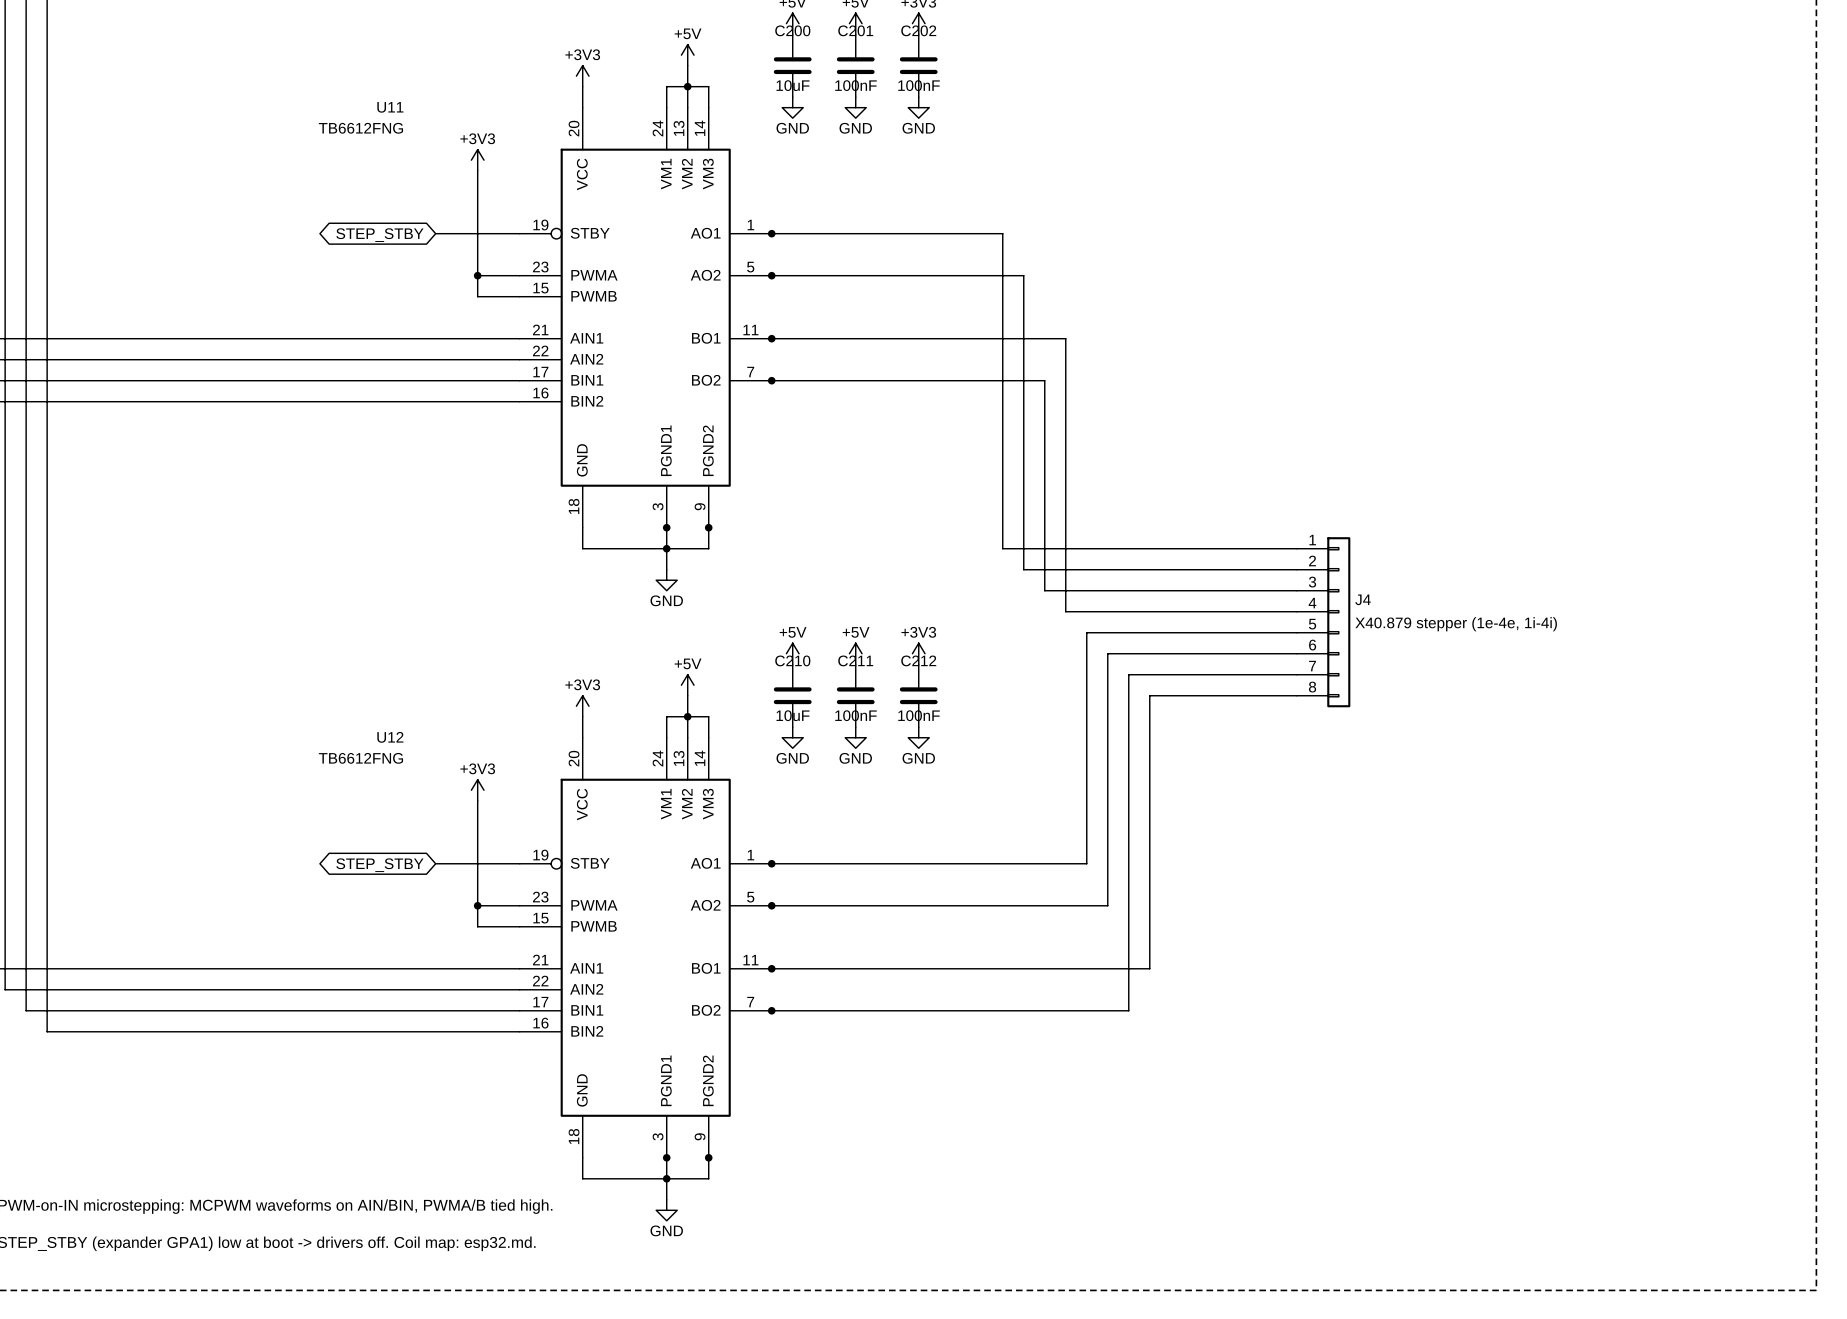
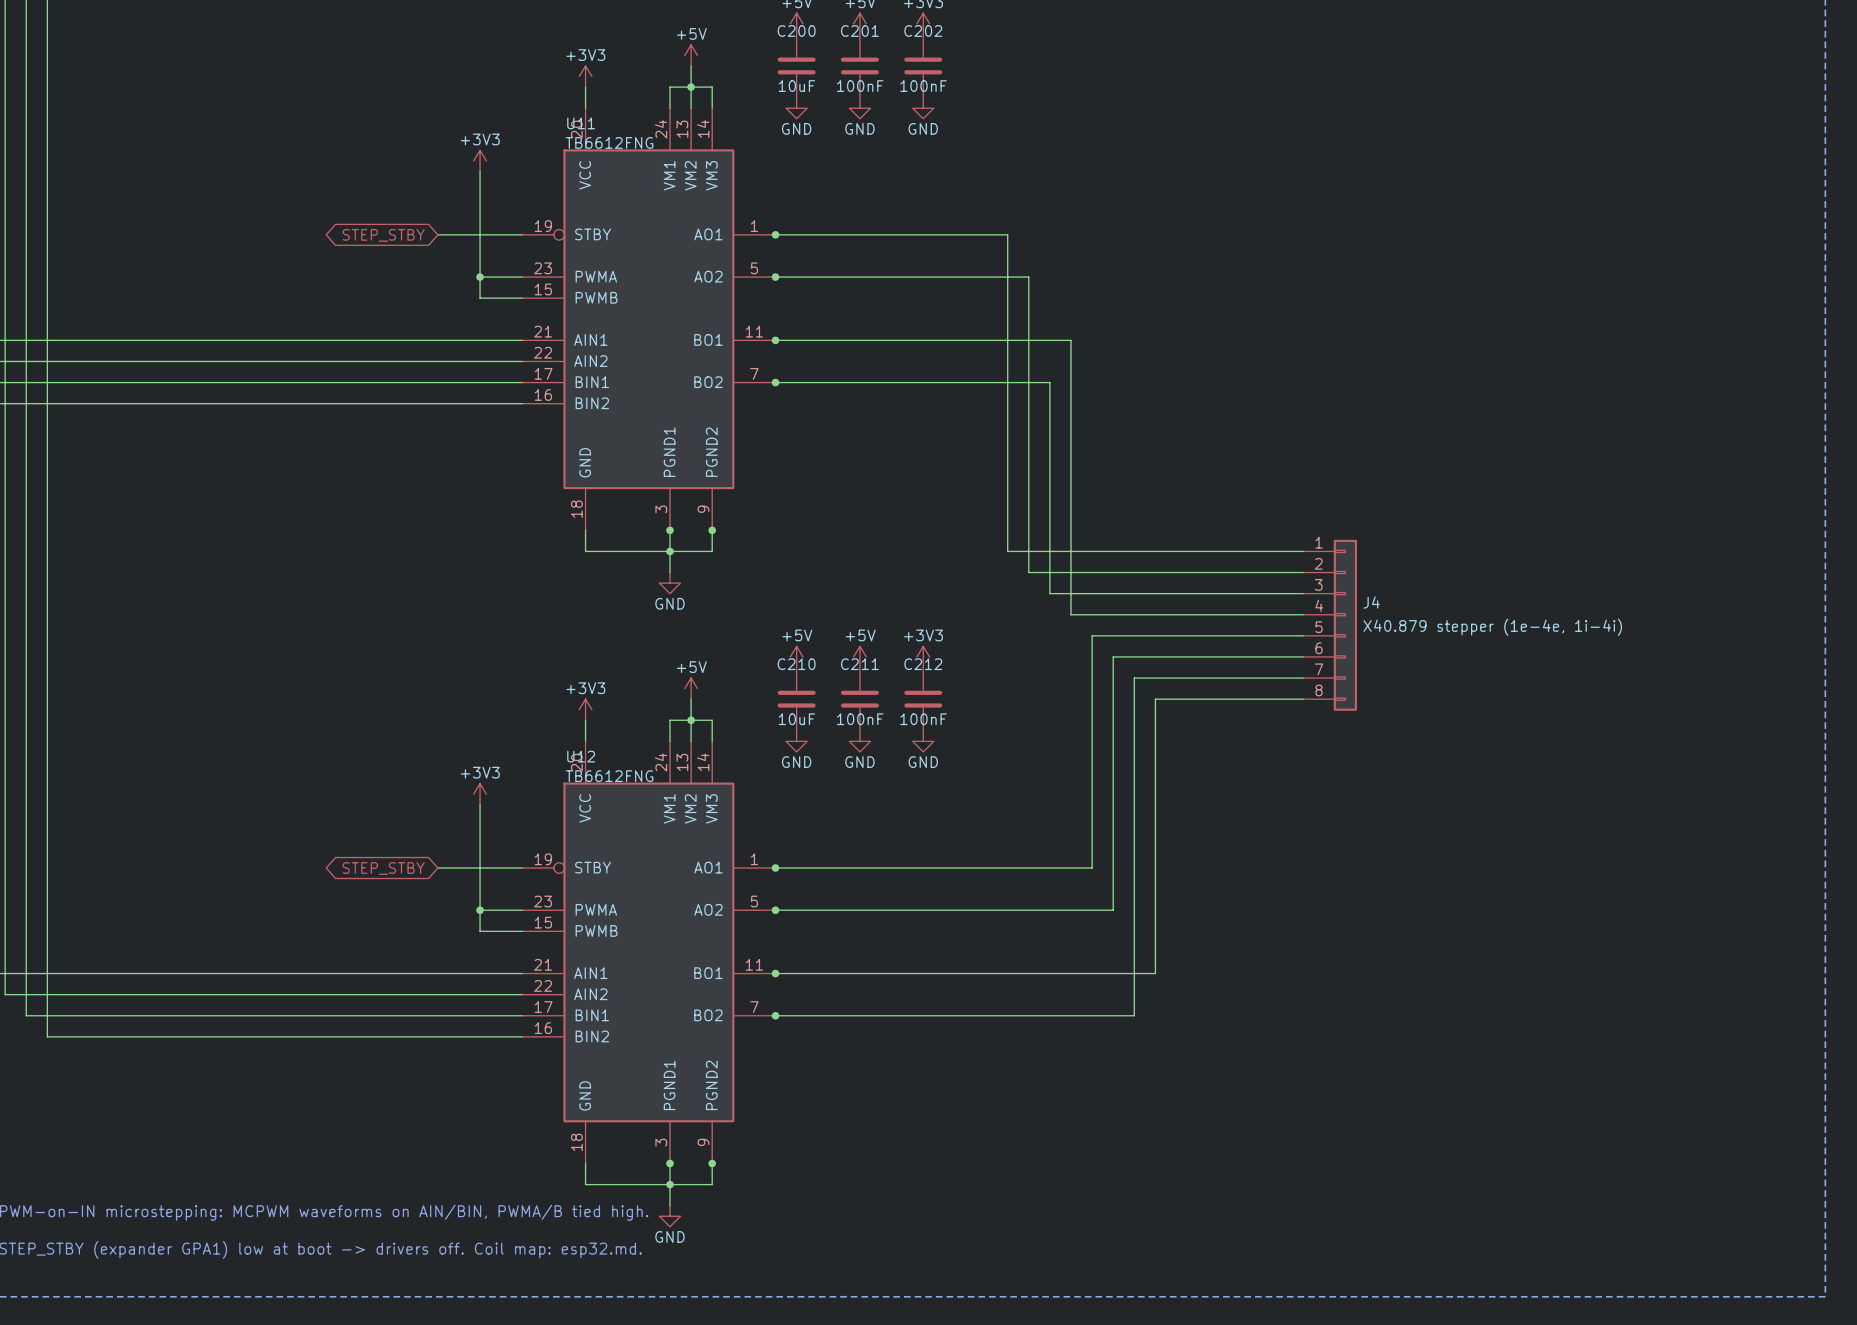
U11 name position: U11 (390, 107) -> U11 (581, 123)
U11 value position: TB6612FNG (360, 128) -> TB6612FNG (609, 142)
U12 name position: U12 (390, 737) -> U12 (581, 756)
U12 value position: TB6612FNG (360, 758) -> TB6612FNG (609, 776)

